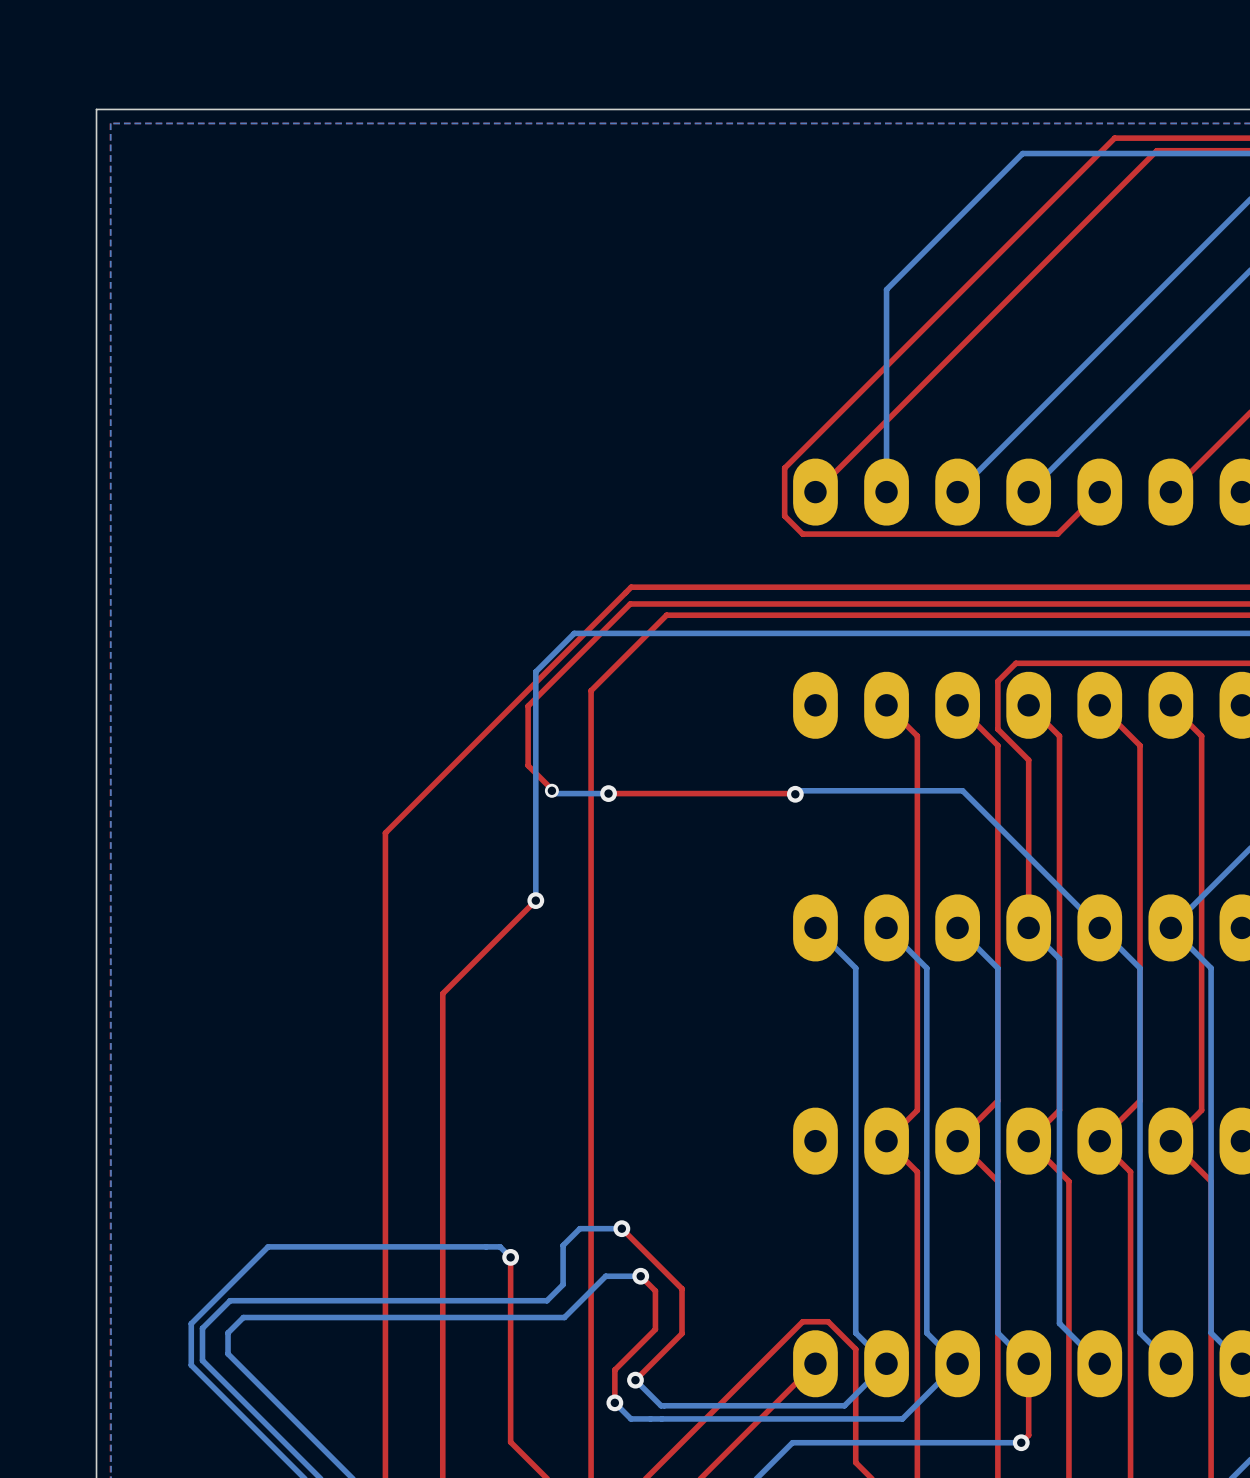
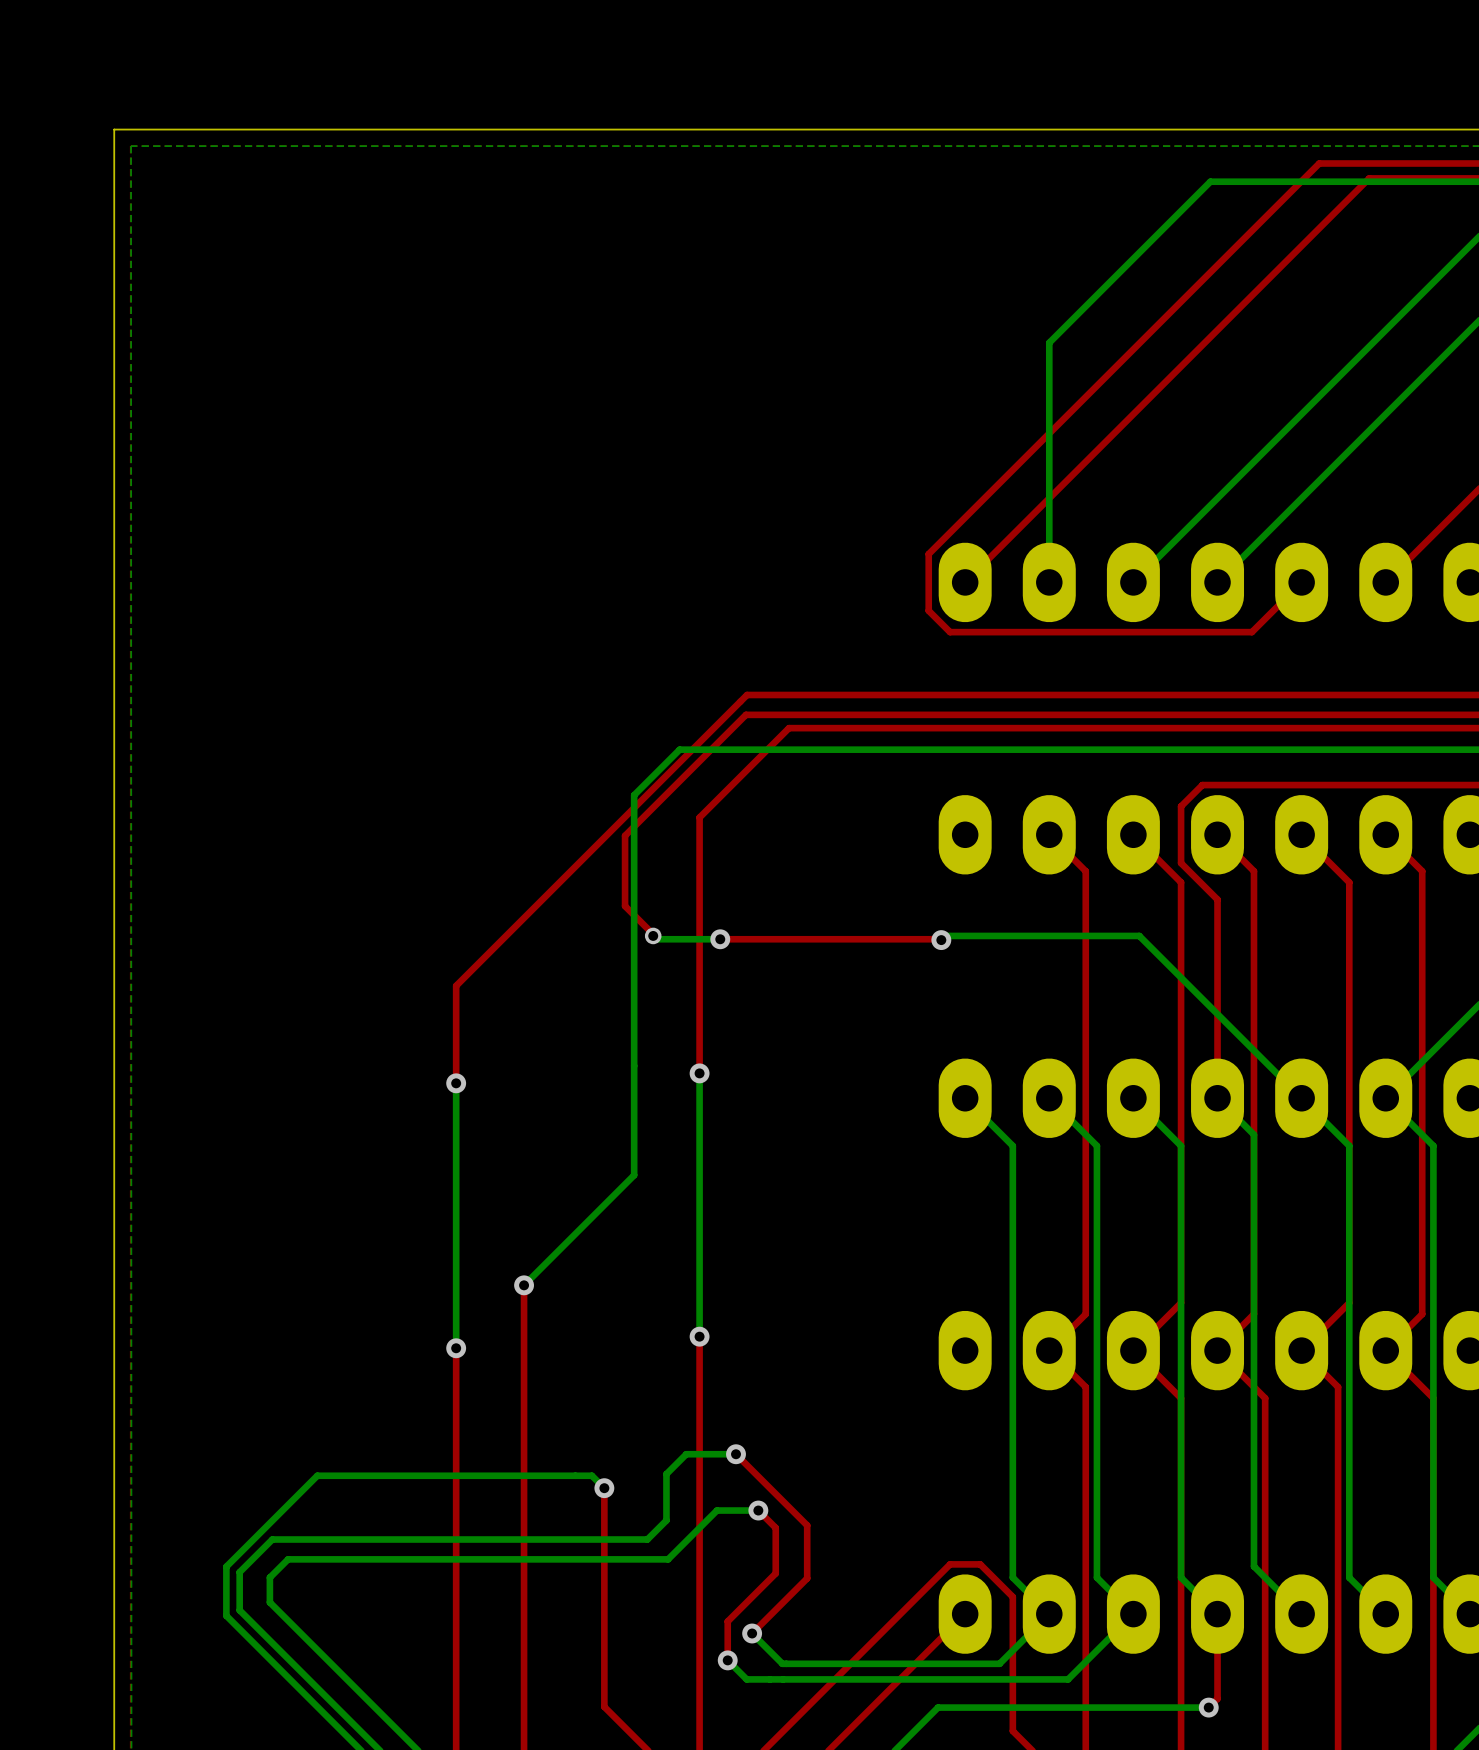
top track: (535, 900) (442, 993) (442, 1085) -> none
bottom track: none -> (634, 1065) (634, 1175) (524, 1285)
via position: (535, 900) -> (699, 1073)
top track: (591, 906) (591, 1129) -> none
bottom track: none -> (699, 1073) (699, 1336)
top track: (385, 915) (385, 1139) -> none
bottom track: none -> (456, 1083) (456, 1348)
via: none -> (456, 1083)
via: none -> (524, 1285)
via: none -> (699, 1336)
via: none -> (456, 1348)

